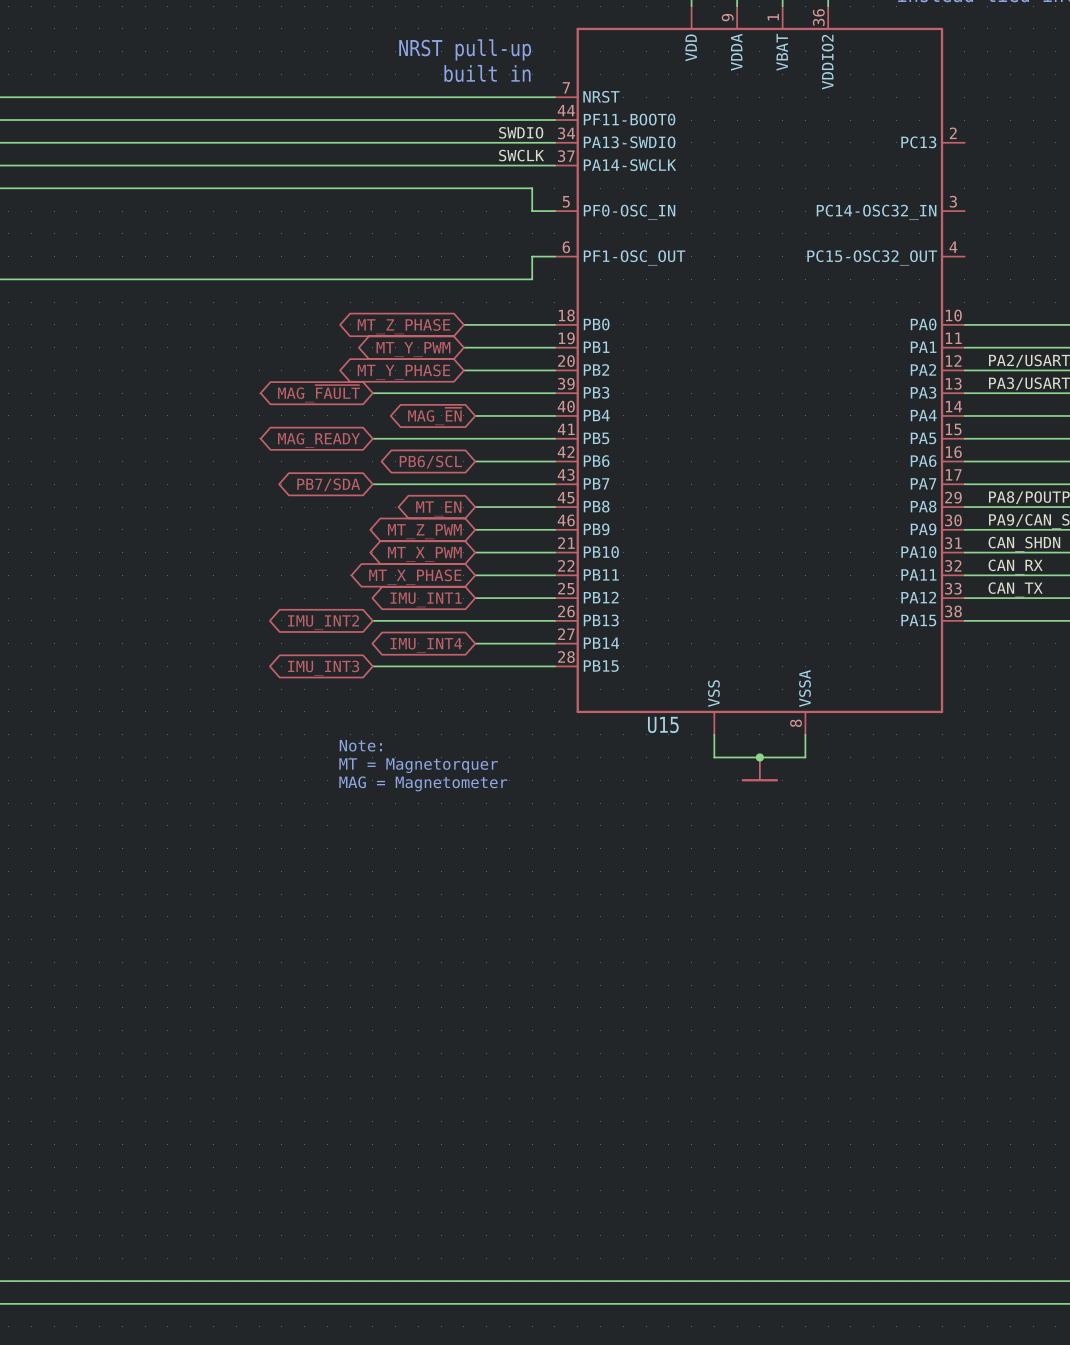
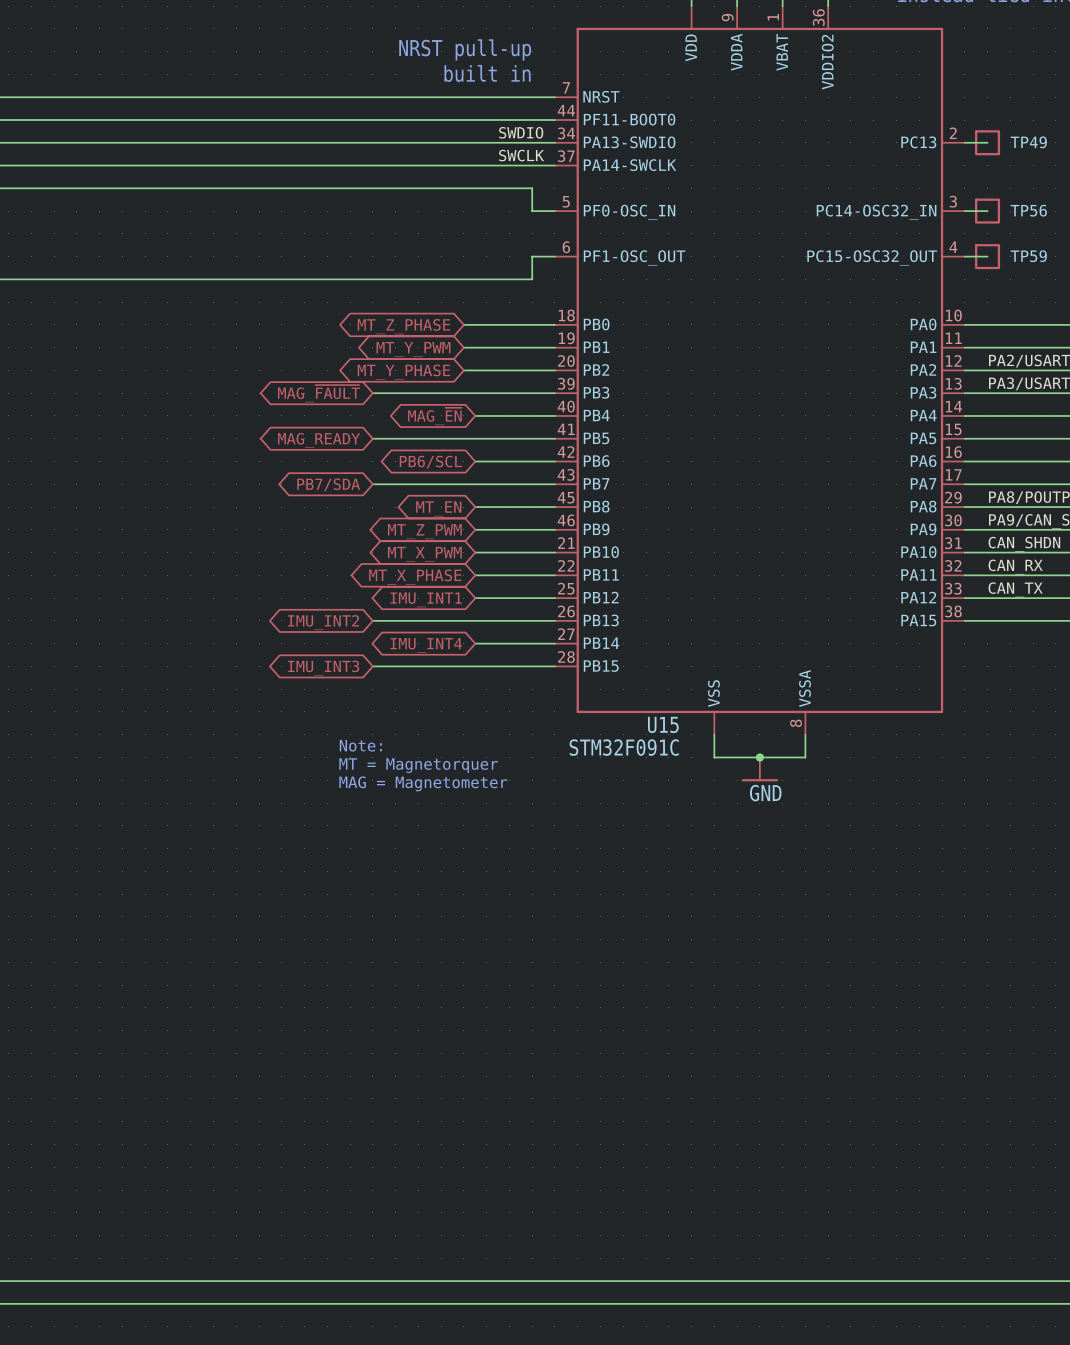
wire: none -> (964, 142) (987, 142)
TP49: none -> (987, 142)
wire: none -> (964, 211) (987, 211)
TP56: none -> (987, 211)
wire: none -> (964, 256) (987, 256)
TP59: none -> (987, 256)
U15 value: none -> STM32F091C (624, 747)
power symbol text: none -> GND (765, 793)

